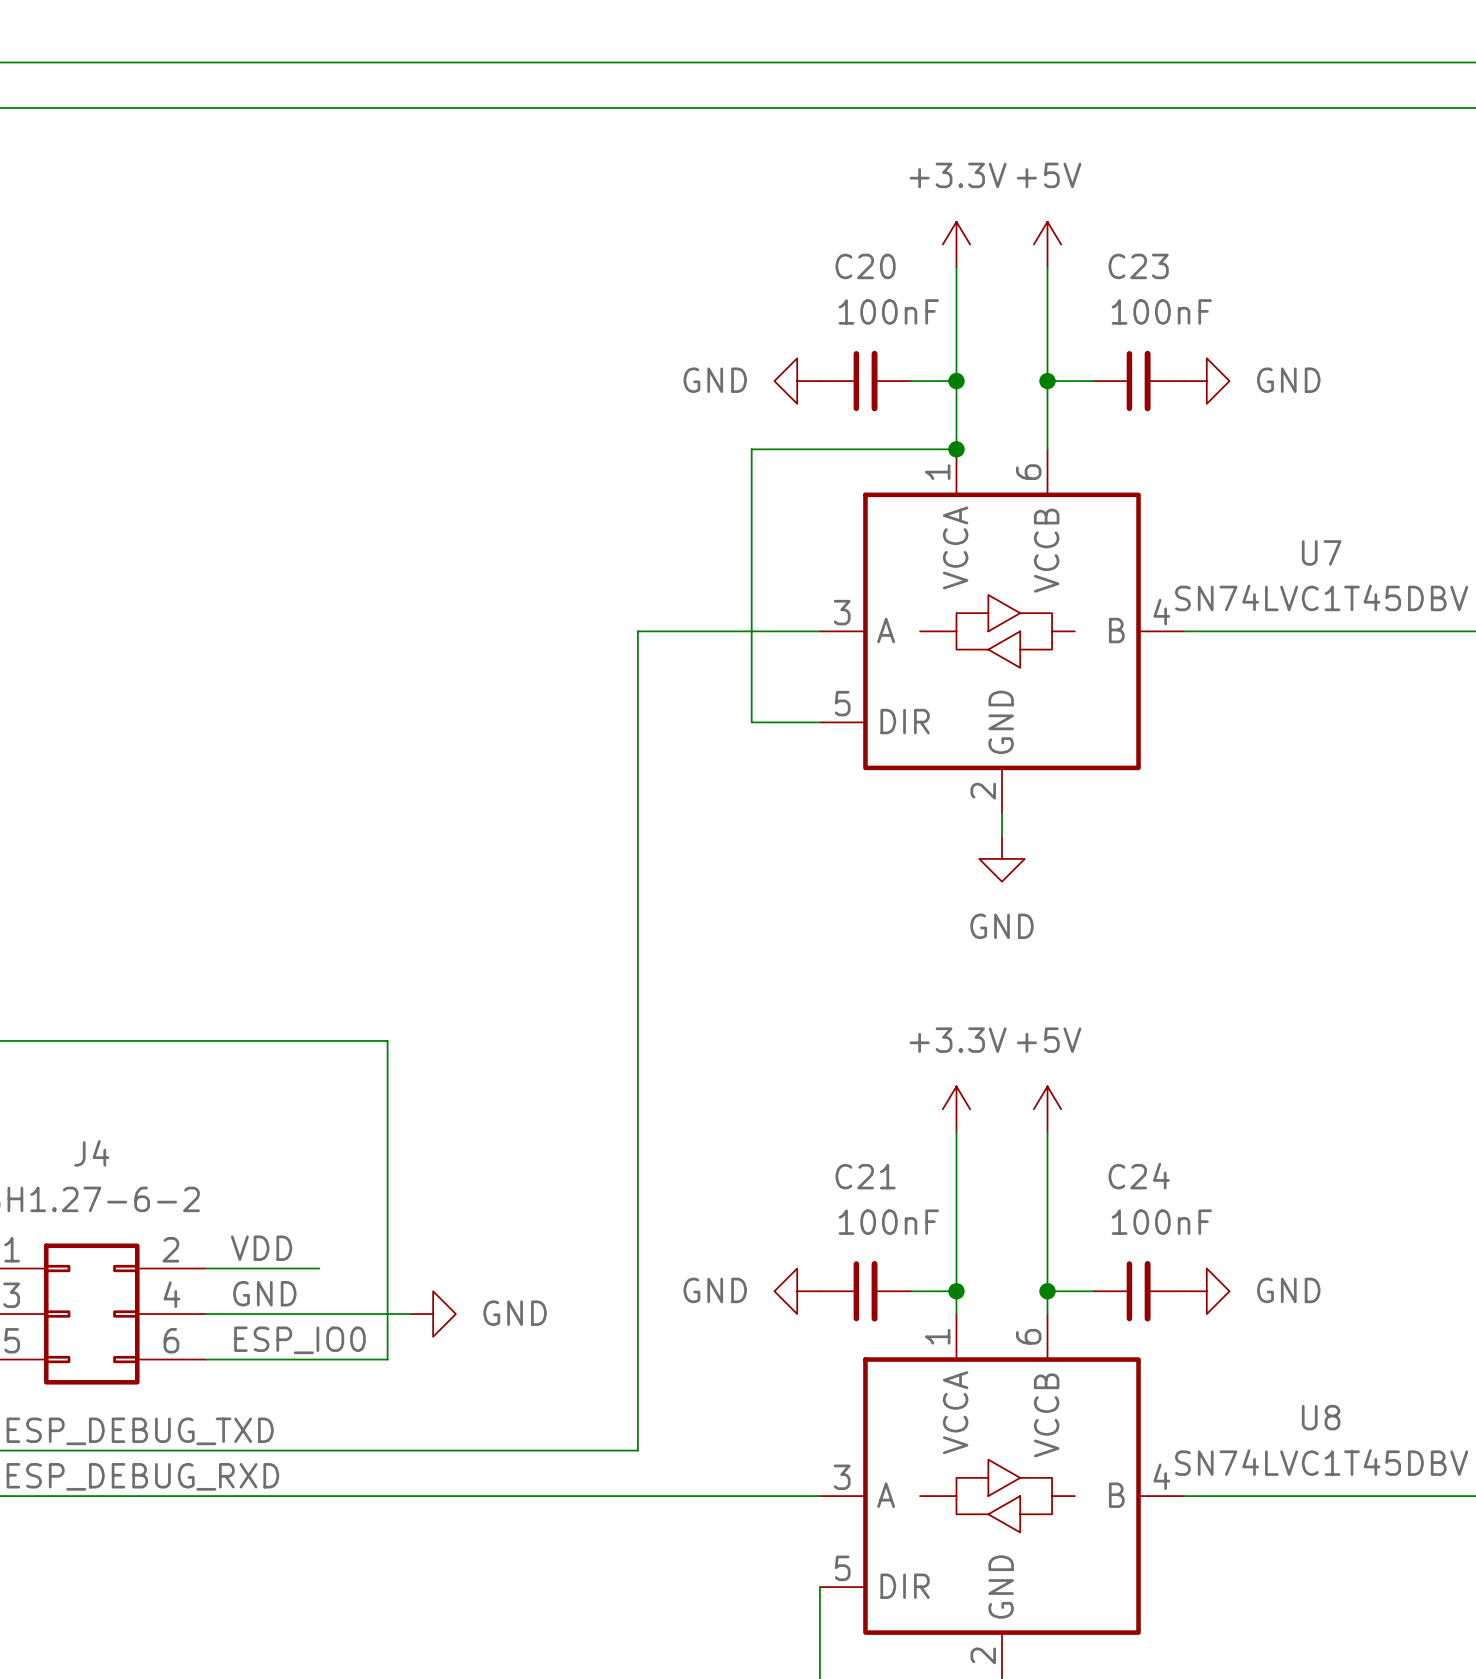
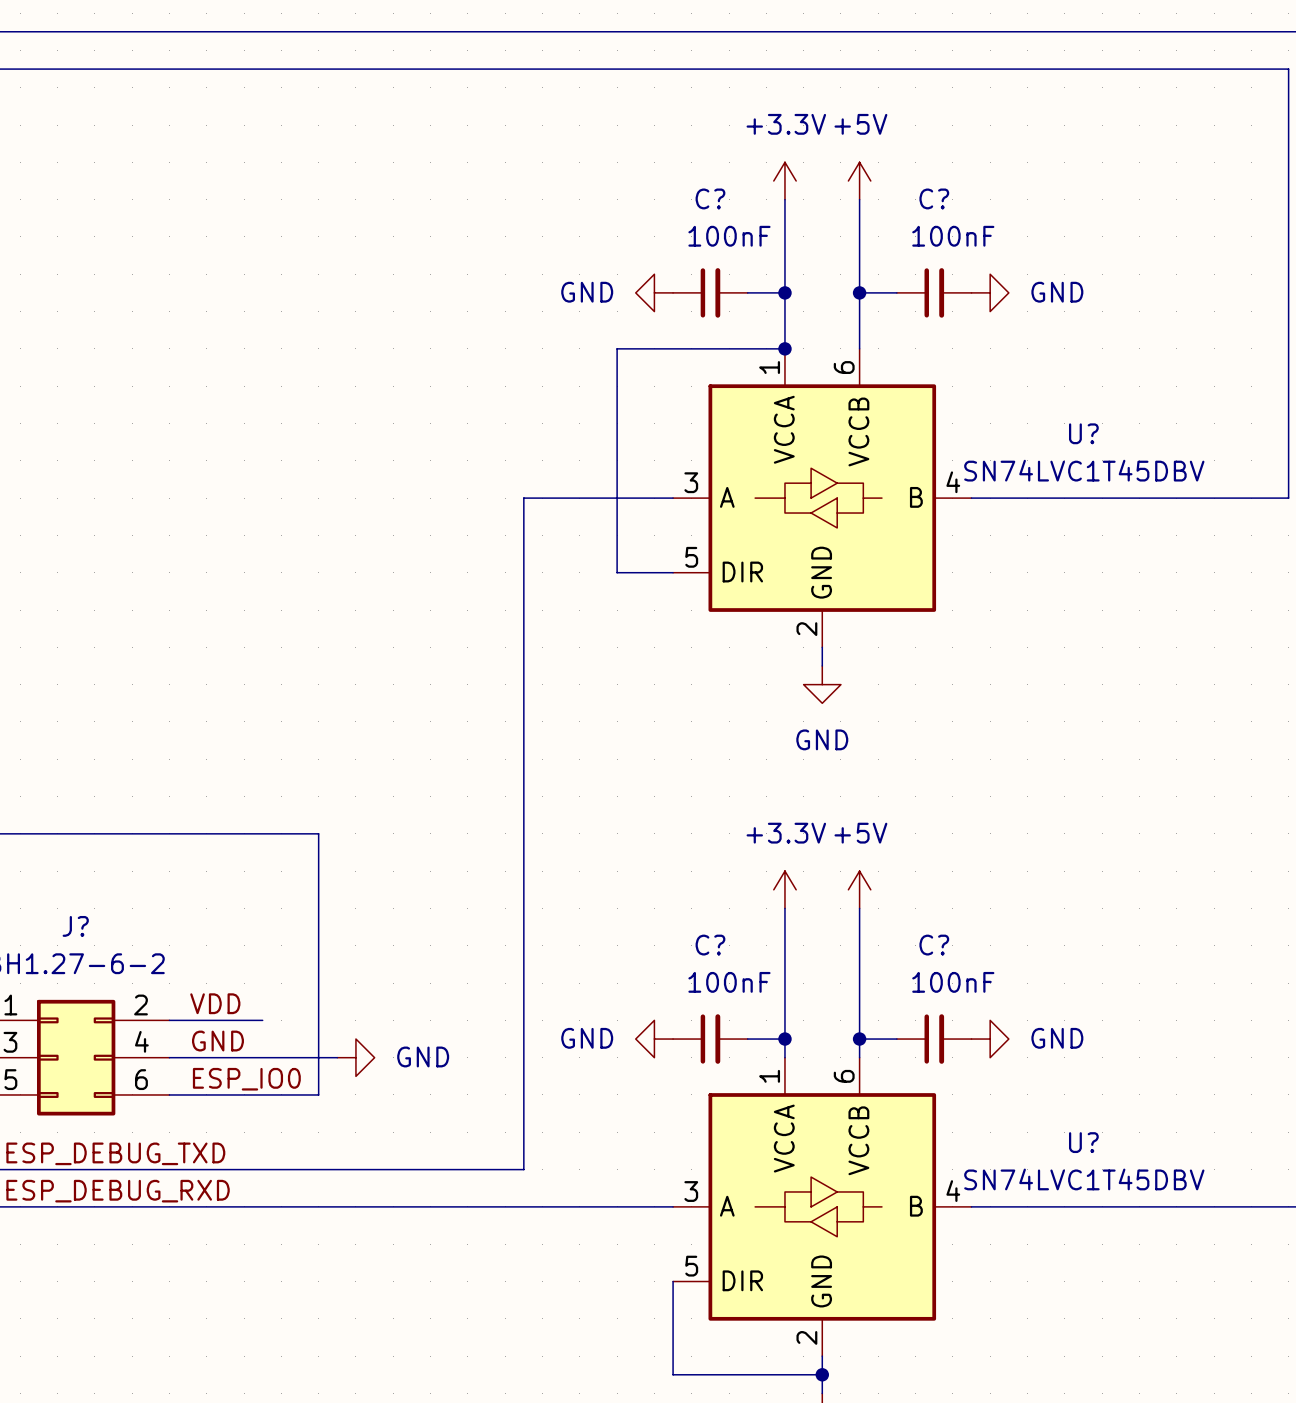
C20 name: C20 (865, 266) -> C? (710, 198)
C23 name: C23 (1138, 266) -> C? (934, 198)
U7 name: U7 (1321, 552) -> U? (1083, 433)
J4 name: J4 (91, 1153) -> J? (75, 926)
C21 name: C21 (865, 1176) -> C? (710, 945)
C24 name: C24 (1139, 1176) -> C? (934, 945)
U8 name: U8 (1321, 1417) -> U? (1083, 1142)

